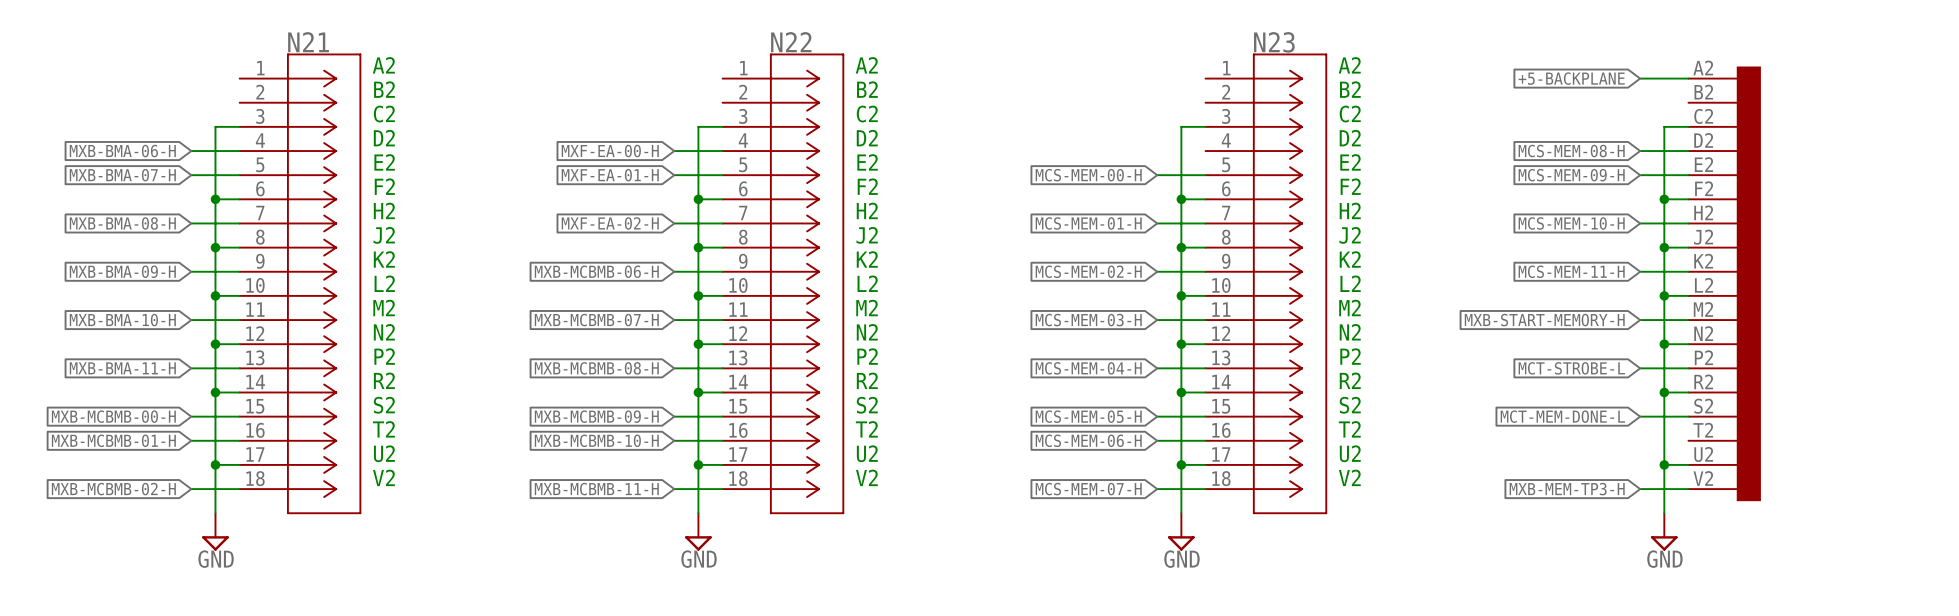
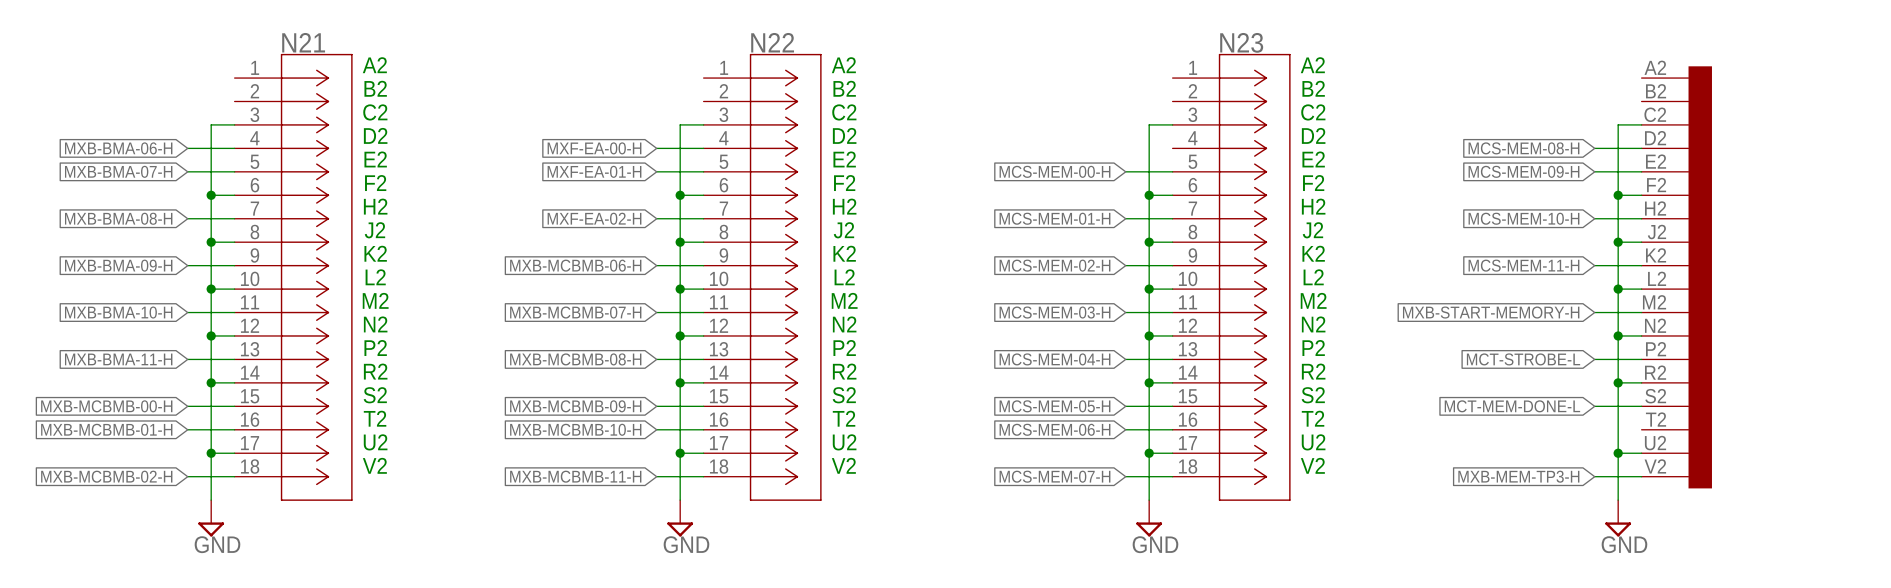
global label: +5-BACKPLANE (1571, 78) -> none
wire: (1640, 78) (1688, 78) -> none

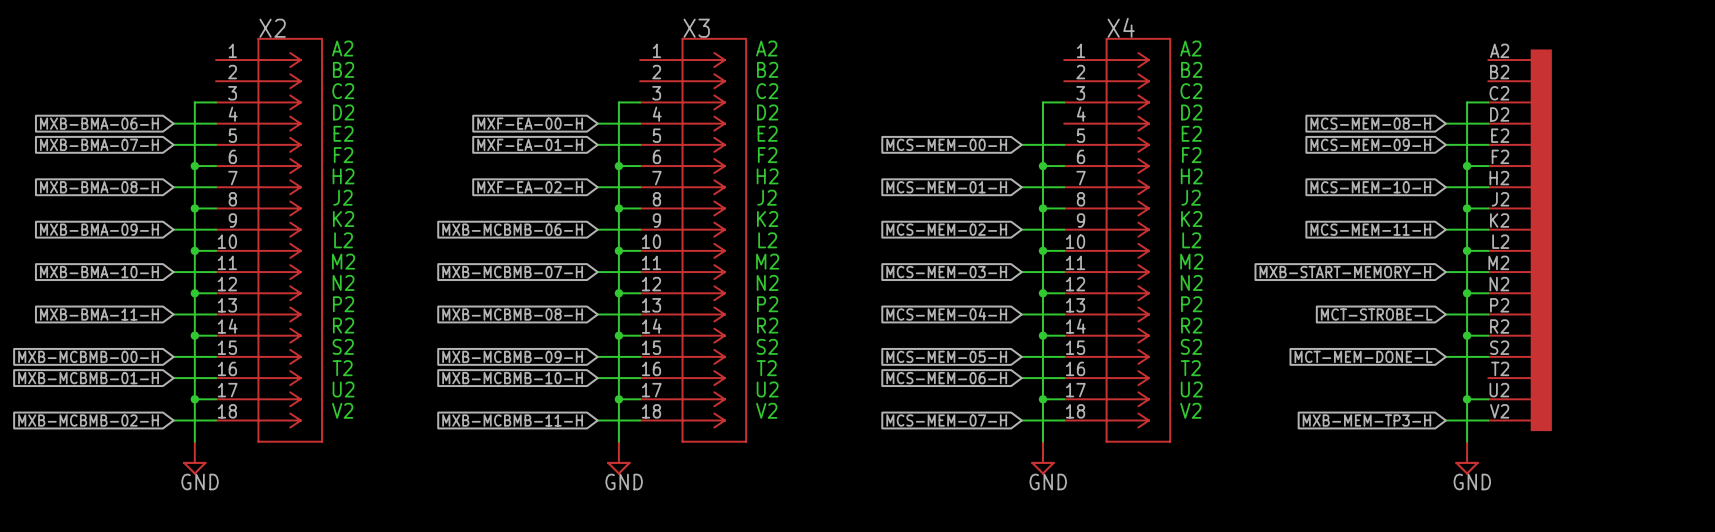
N21 name: N21 (303, 42) -> X2 (272, 28)
N22 name: N22 (772, 42) -> X3 (696, 28)
N23 name: N23 (1241, 42) -> X4 (1121, 27)

